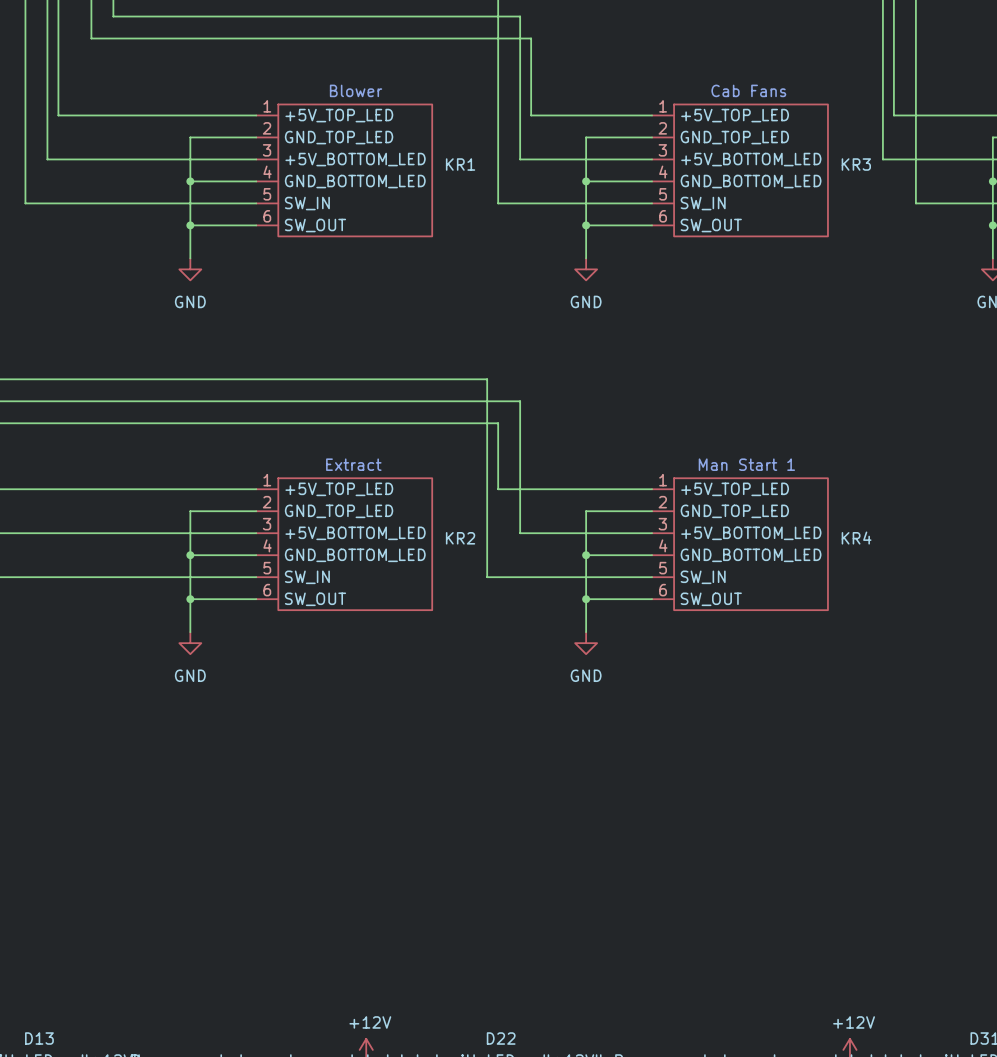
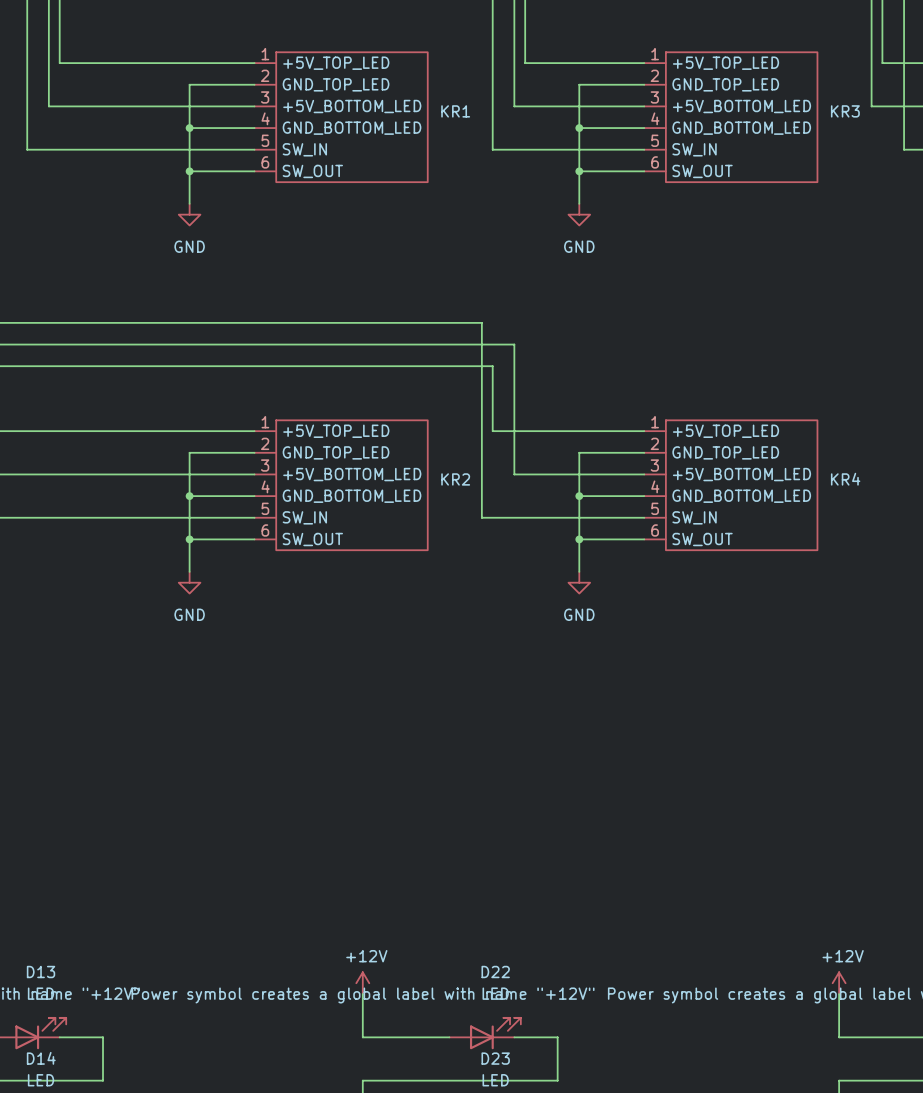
text: Blower (356, 90) -> none
text: Cab Fans (748, 90) -> none
text: Extract (353, 464) -> none
text: Man Start 1 (746, 464) -> none

